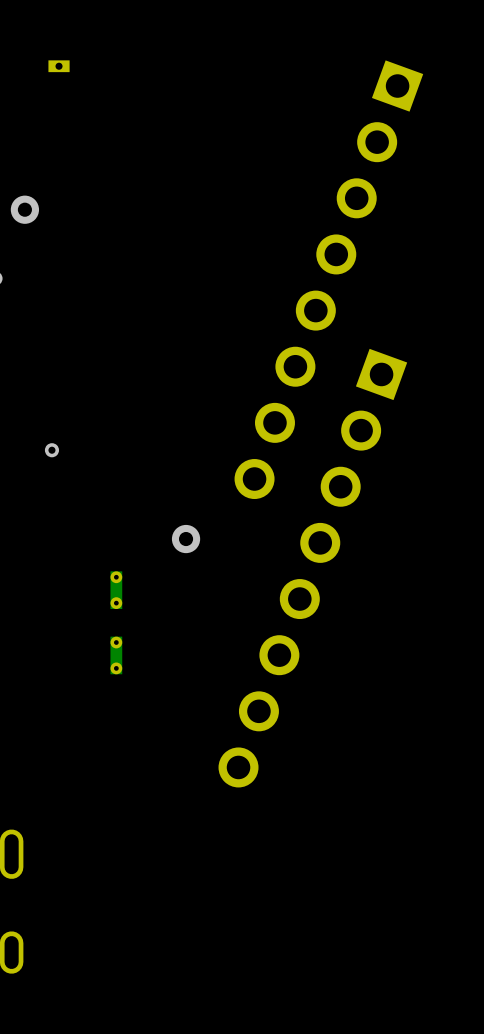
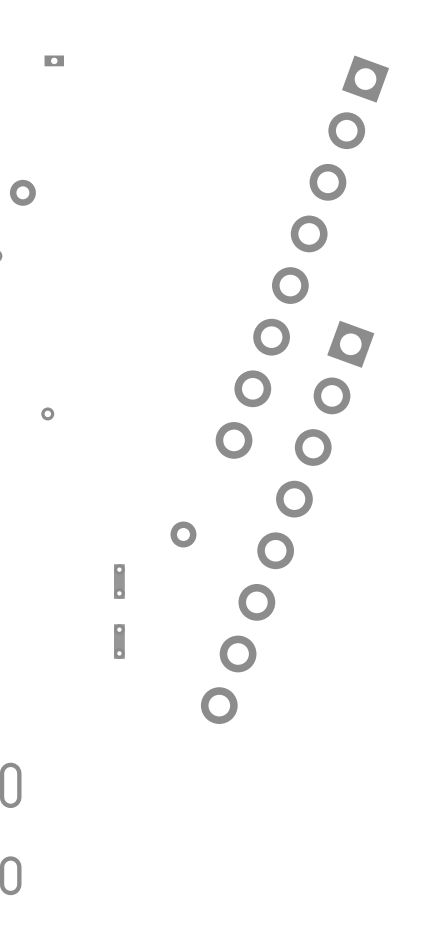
via position: (186, 539) -> (183, 534)
part: (116, 590) -> none
part: none -> (119, 581)
part: (116, 655) -> none
part: none -> (119, 641)

